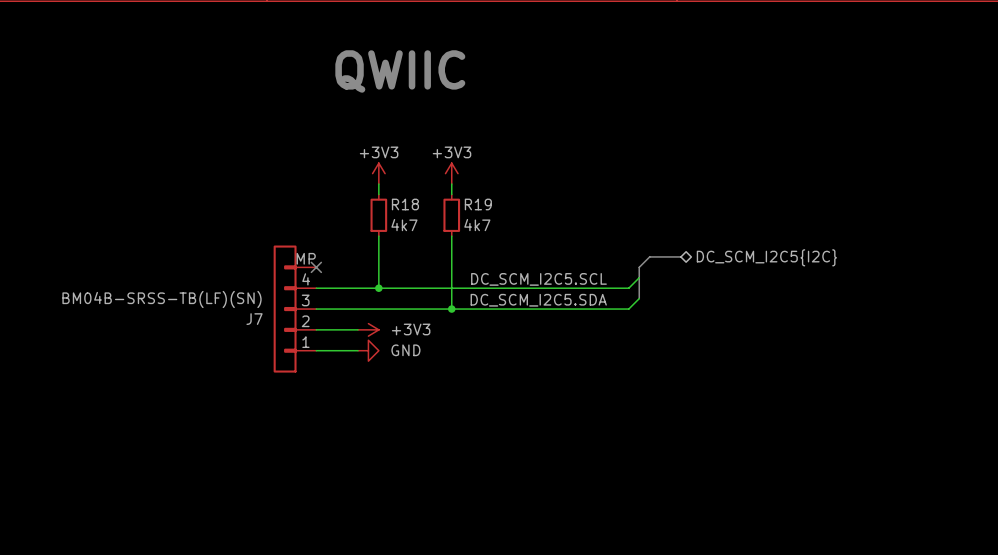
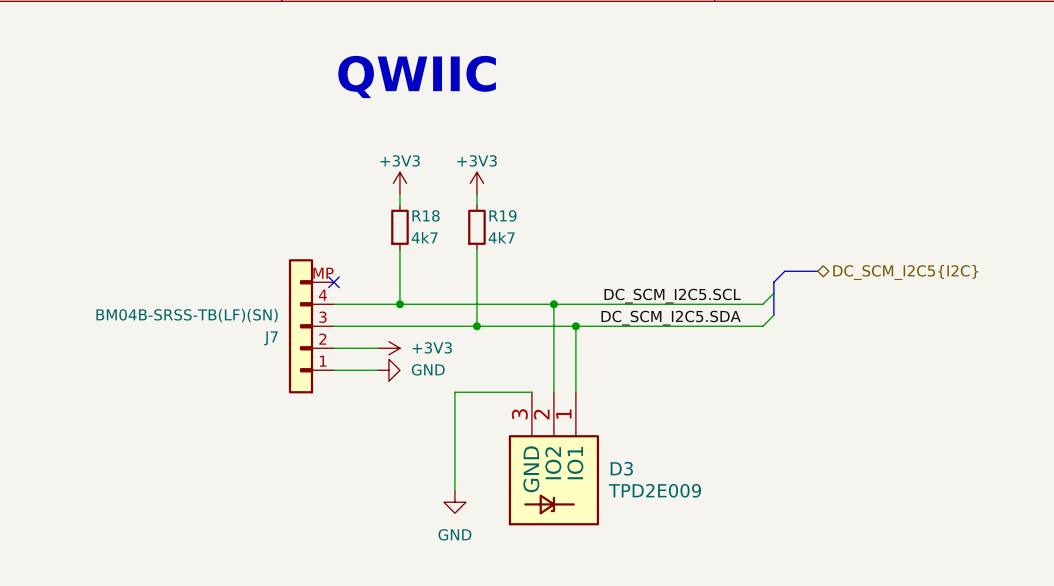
bus: (680, 256) (649, 256) (639, 267) (639, 298) -> (817, 271) (784, 271) (773, 282) (773, 315)
hierarchical label position: DC_SCM_I2C5{I2C} (766, 257) -> DC_SCM_I2C5{I2C} (905, 272)
wire: (639, 277) (628, 288) -> (773, 293) (762, 304) (663, 304)
label position: DC_SCM_I2C5.SCL (538, 279) -> DC_SCM_I2C5.SCL (672, 296)
wire: none -> (553, 304) (553, 392)
junction: none -> (553, 304)
wire: (639, 298) (628, 309) -> (773, 315) (762, 326) (663, 326)
label position: DC_SCM_I2C5.SDA (538, 300) -> DC_SCM_I2C5.SDA (671, 318)
wire: none -> (575, 326) (575, 392)
junction: none -> (575, 326)
wire: none -> (531, 392) (454, 392) (454, 491)
D3: none -> TPD2E009 (553, 458)
power symbol: none -> GND (454, 502)

